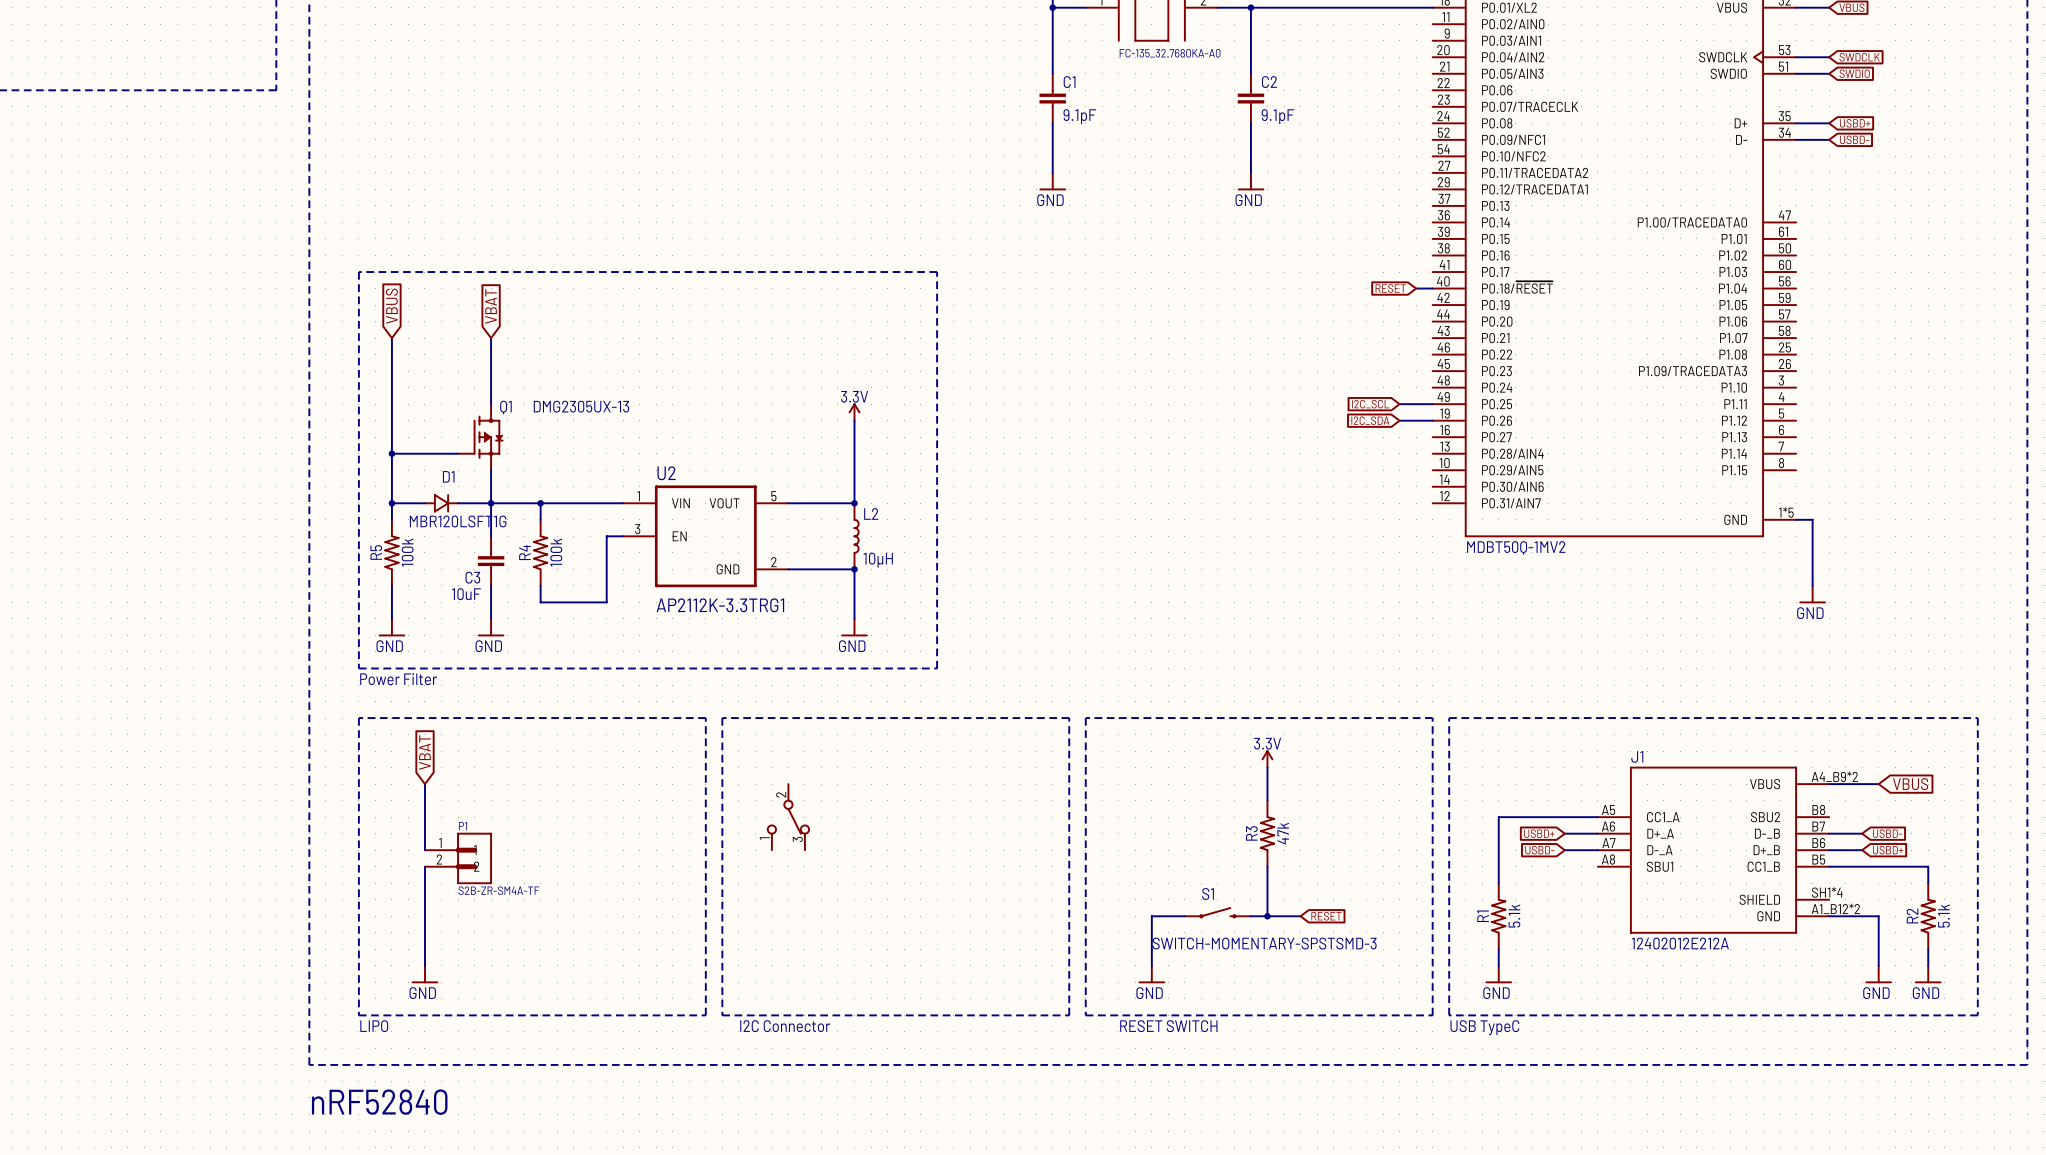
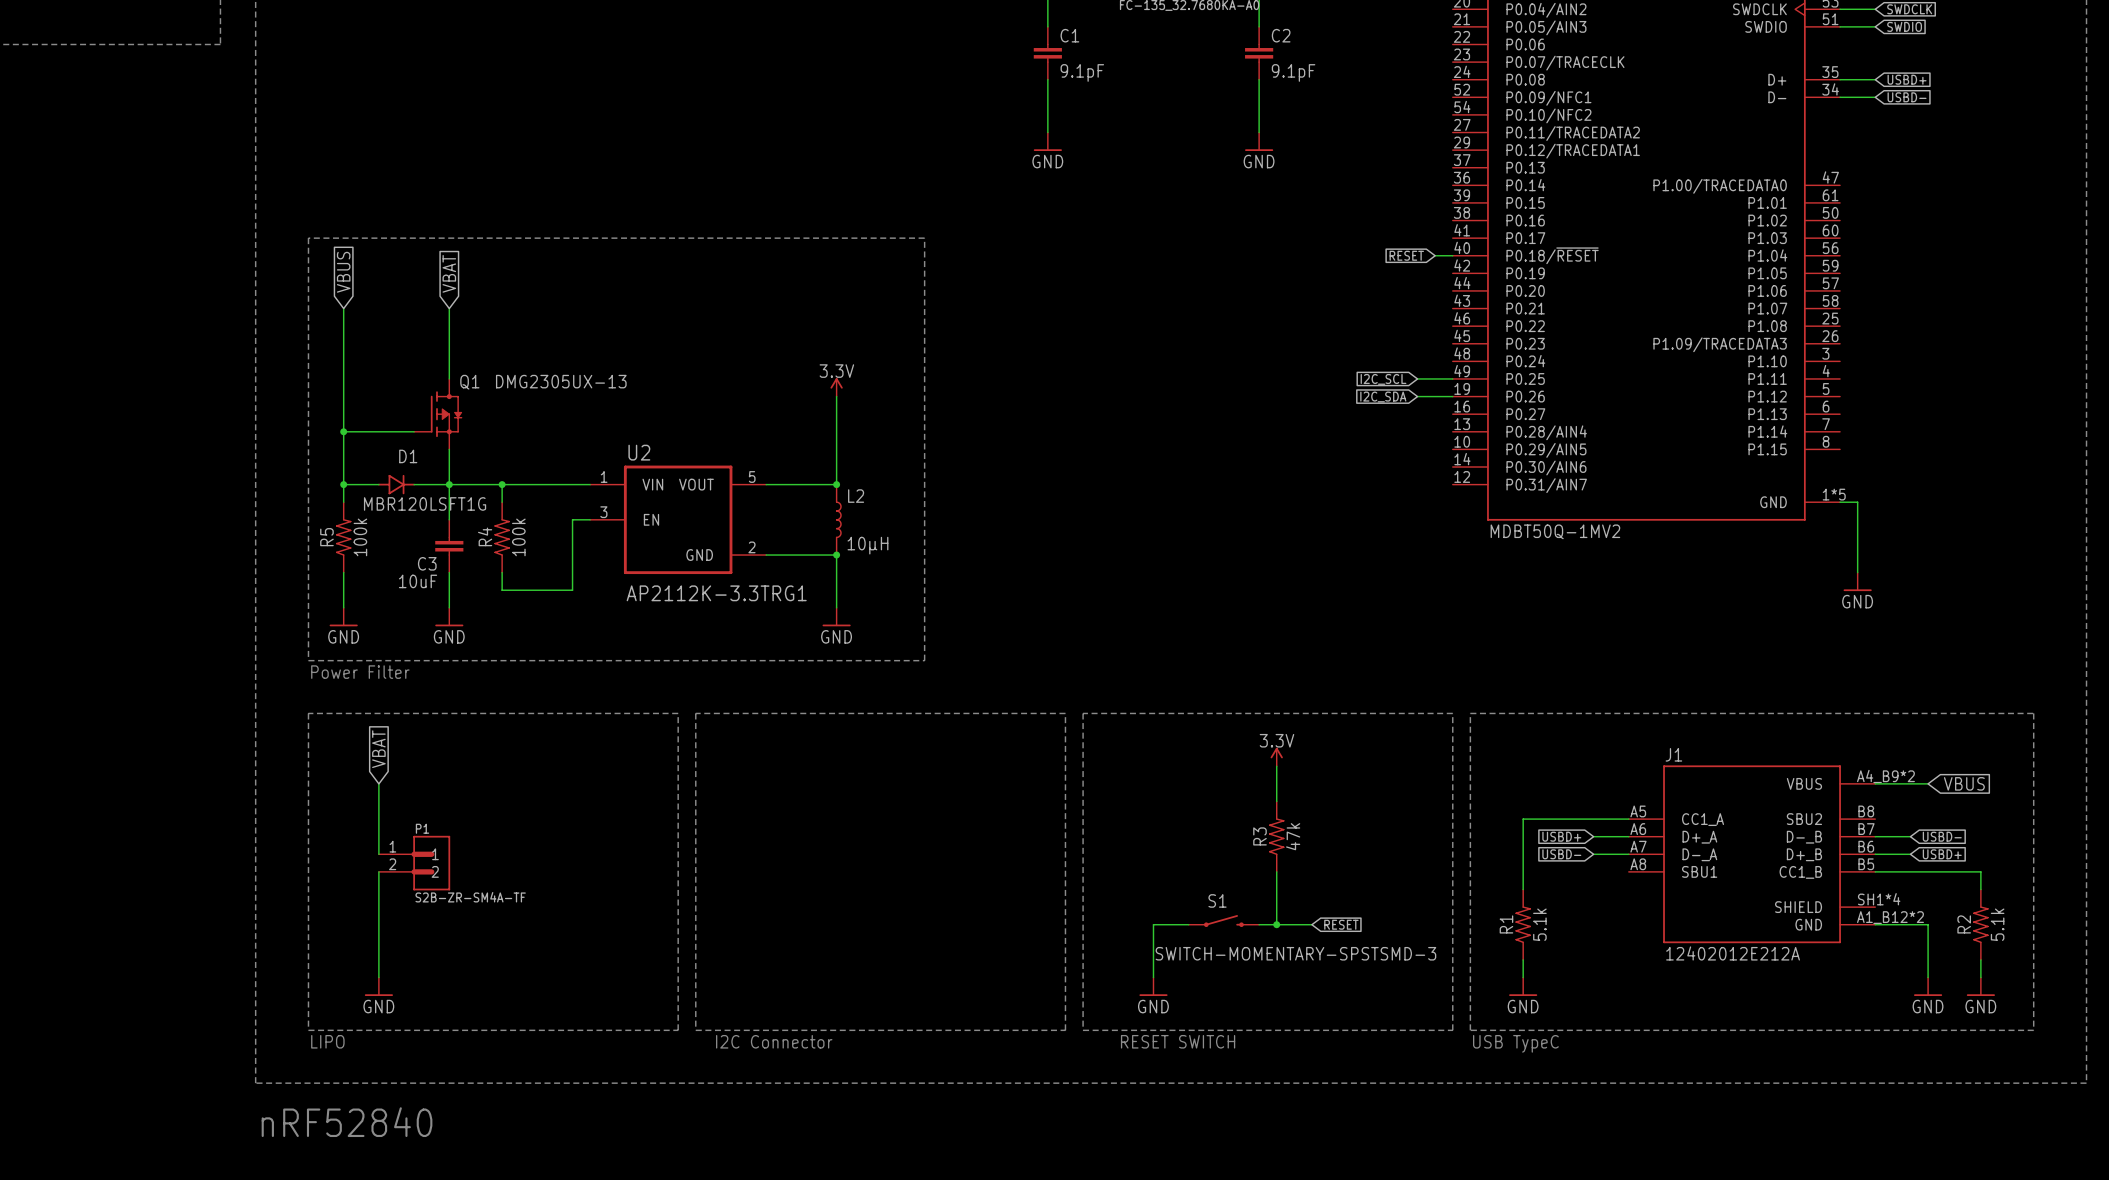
part: (788, 817) -> none

